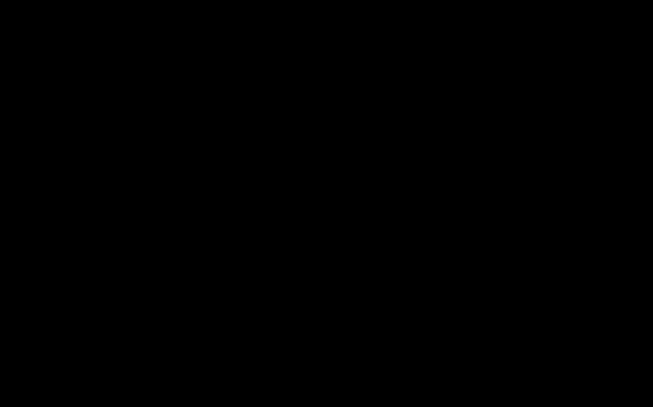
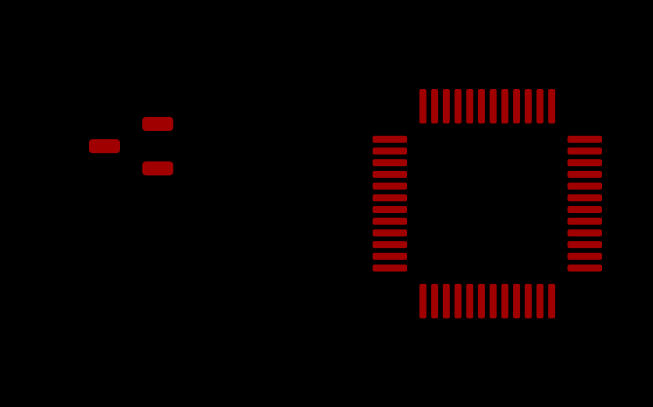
part: none -> (131, 146)
part: none -> (487, 203)

